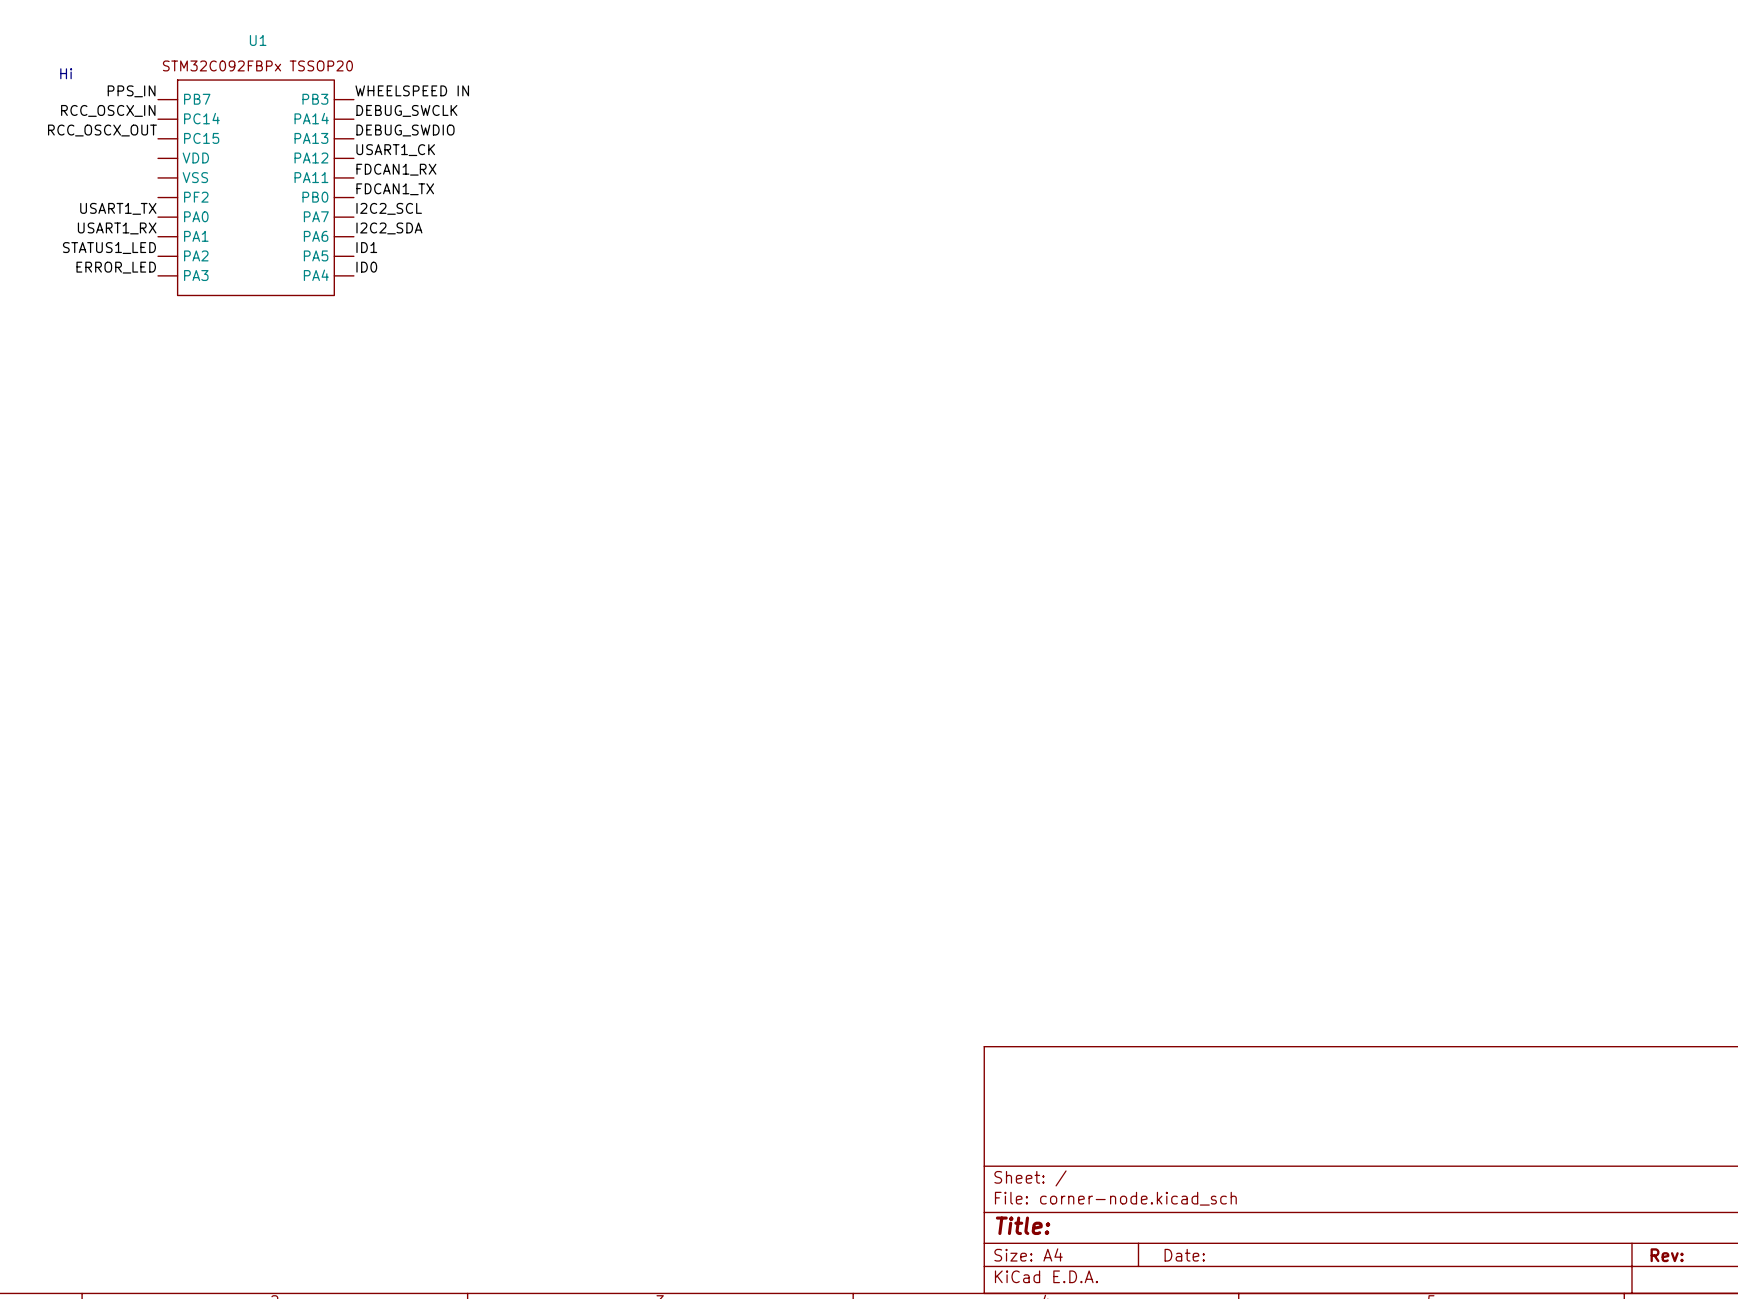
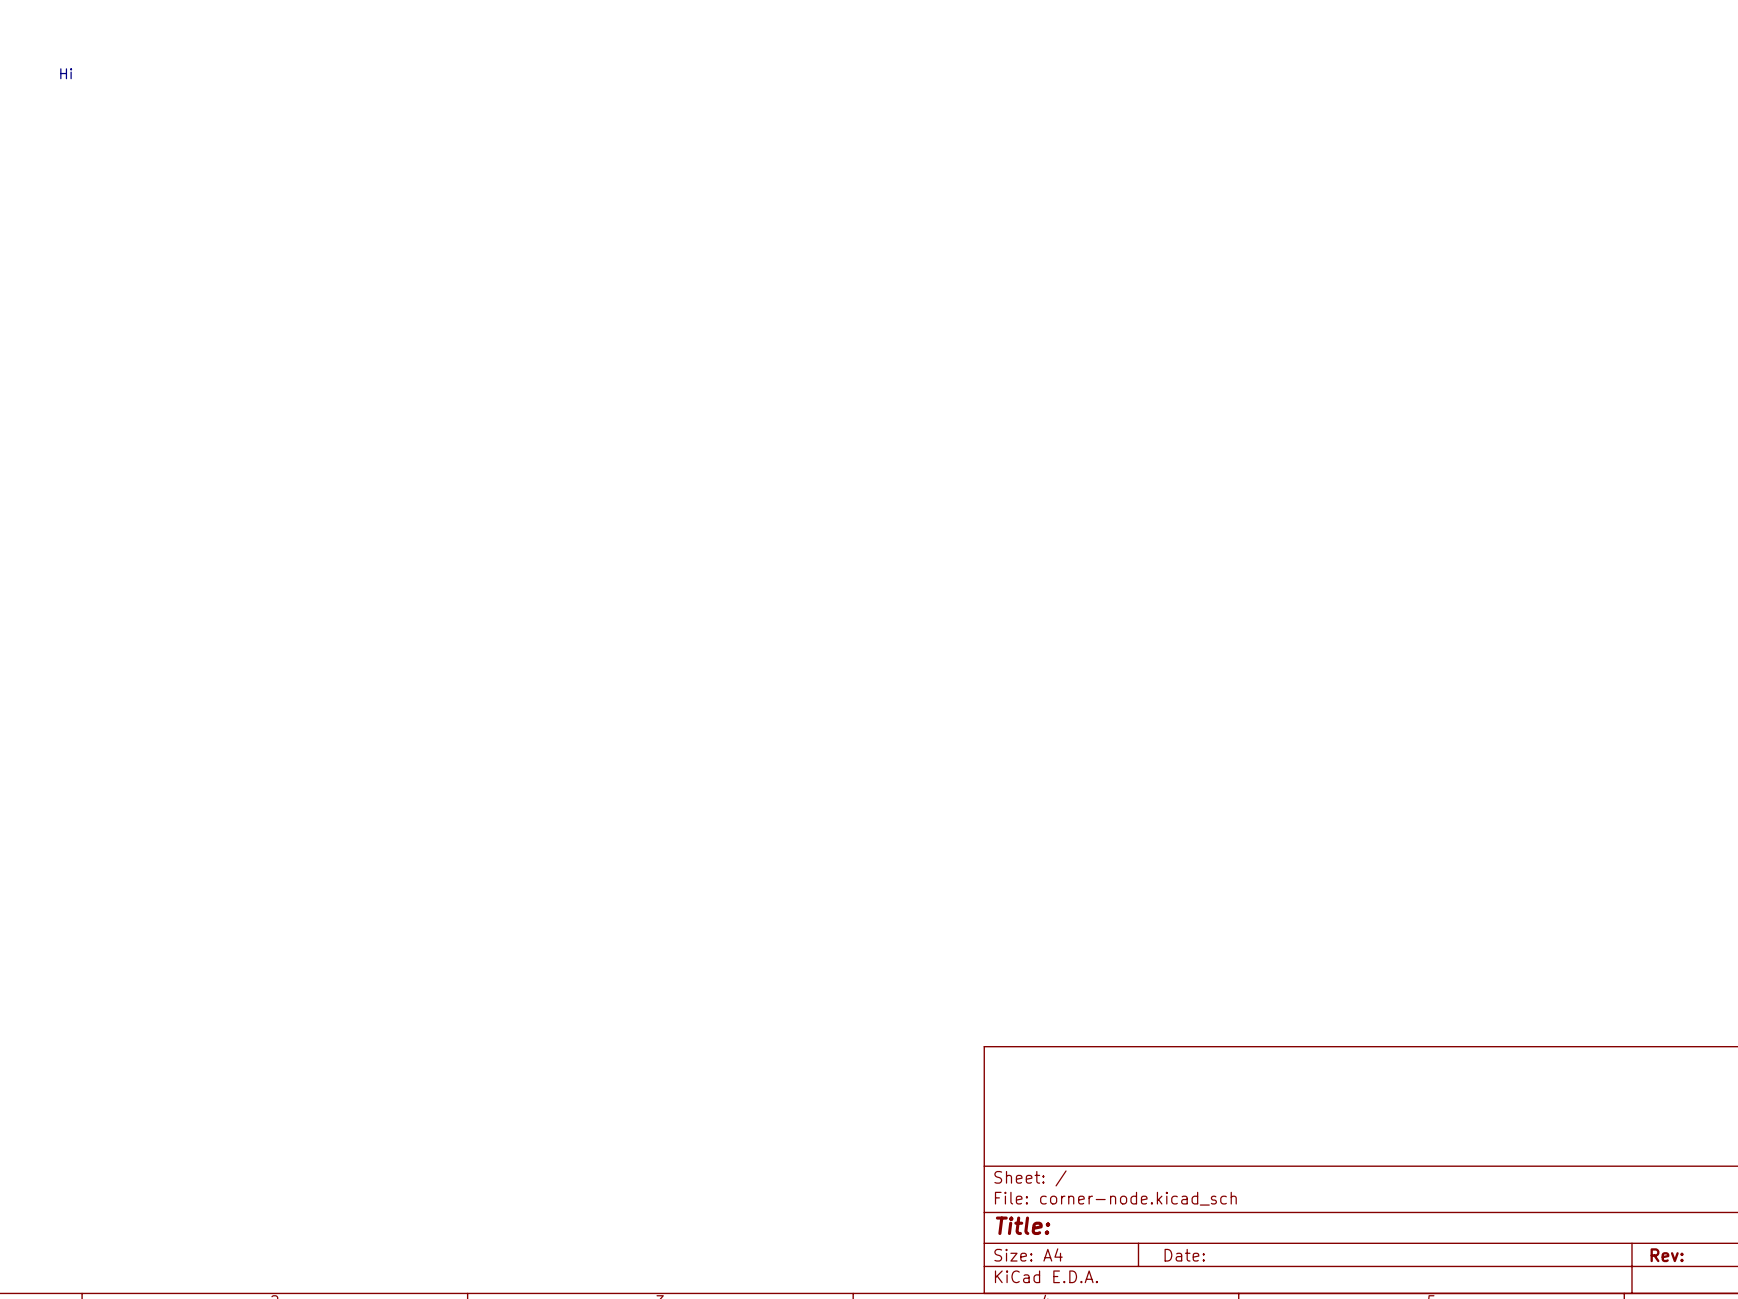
label: WHEELSPEED IN (412, 90) -> none
label: PPS_IN (131, 91) -> none
label: RCC_OSCX_IN (108, 110) -> none
label: DEBUG_SWCLK (406, 110) -> none
label: RCC_OSCX_OUT (102, 130) -> none
label: DEBUG_SWDIO (405, 130) -> none
label: USART1_CK (395, 150) -> none
label: FDCAN1_RX (396, 169) -> none
U1: (255, 187) -> none
label: FDCAN1_TX (395, 189) -> none
label: USART1_TX (118, 208) -> none
label: I2C2_SCL (389, 208) -> none
label: USART1_RX (117, 228) -> none
label: I2C2_SDA (389, 228) -> none
label: ID1 (366, 247) -> none
label: STATUS1_LED (109, 248) -> none
label: ERROR_LED (116, 267) -> none
label: ID0 (366, 267) -> none

